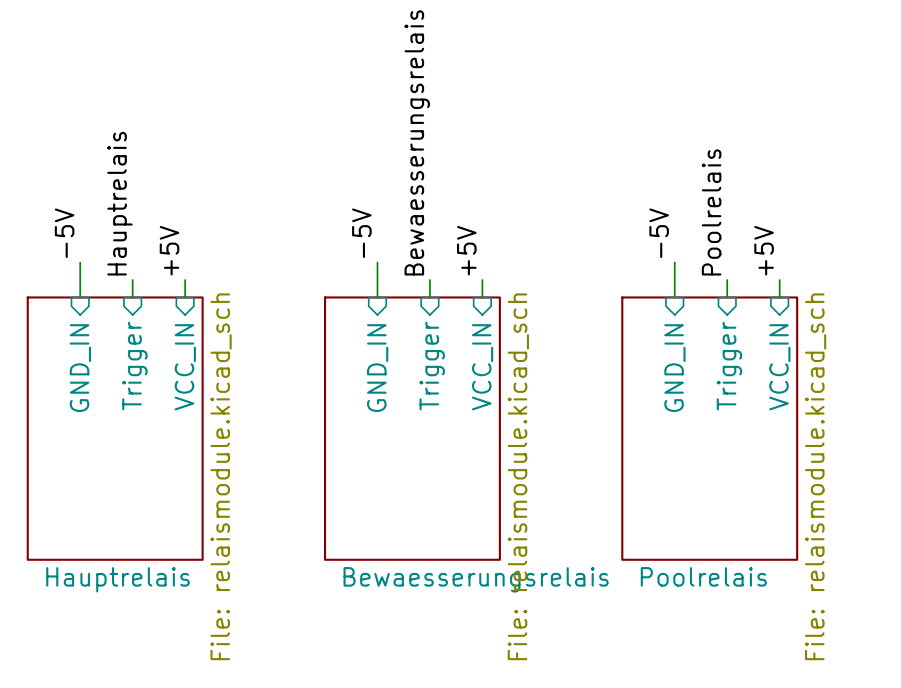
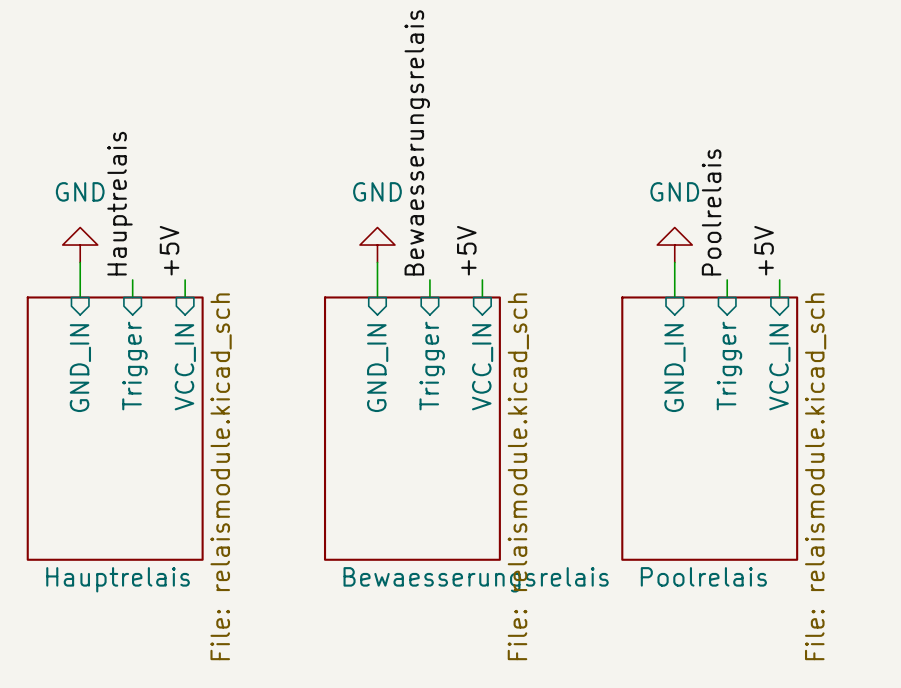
label: -5V (64, 233) -> none
label: -5V (361, 233) -> none
label: -5V (659, 233) -> none
power symbol: none -> GND (80, 245)
power symbol: none -> GND (377, 245)
power symbol: none -> GND (674, 245)

